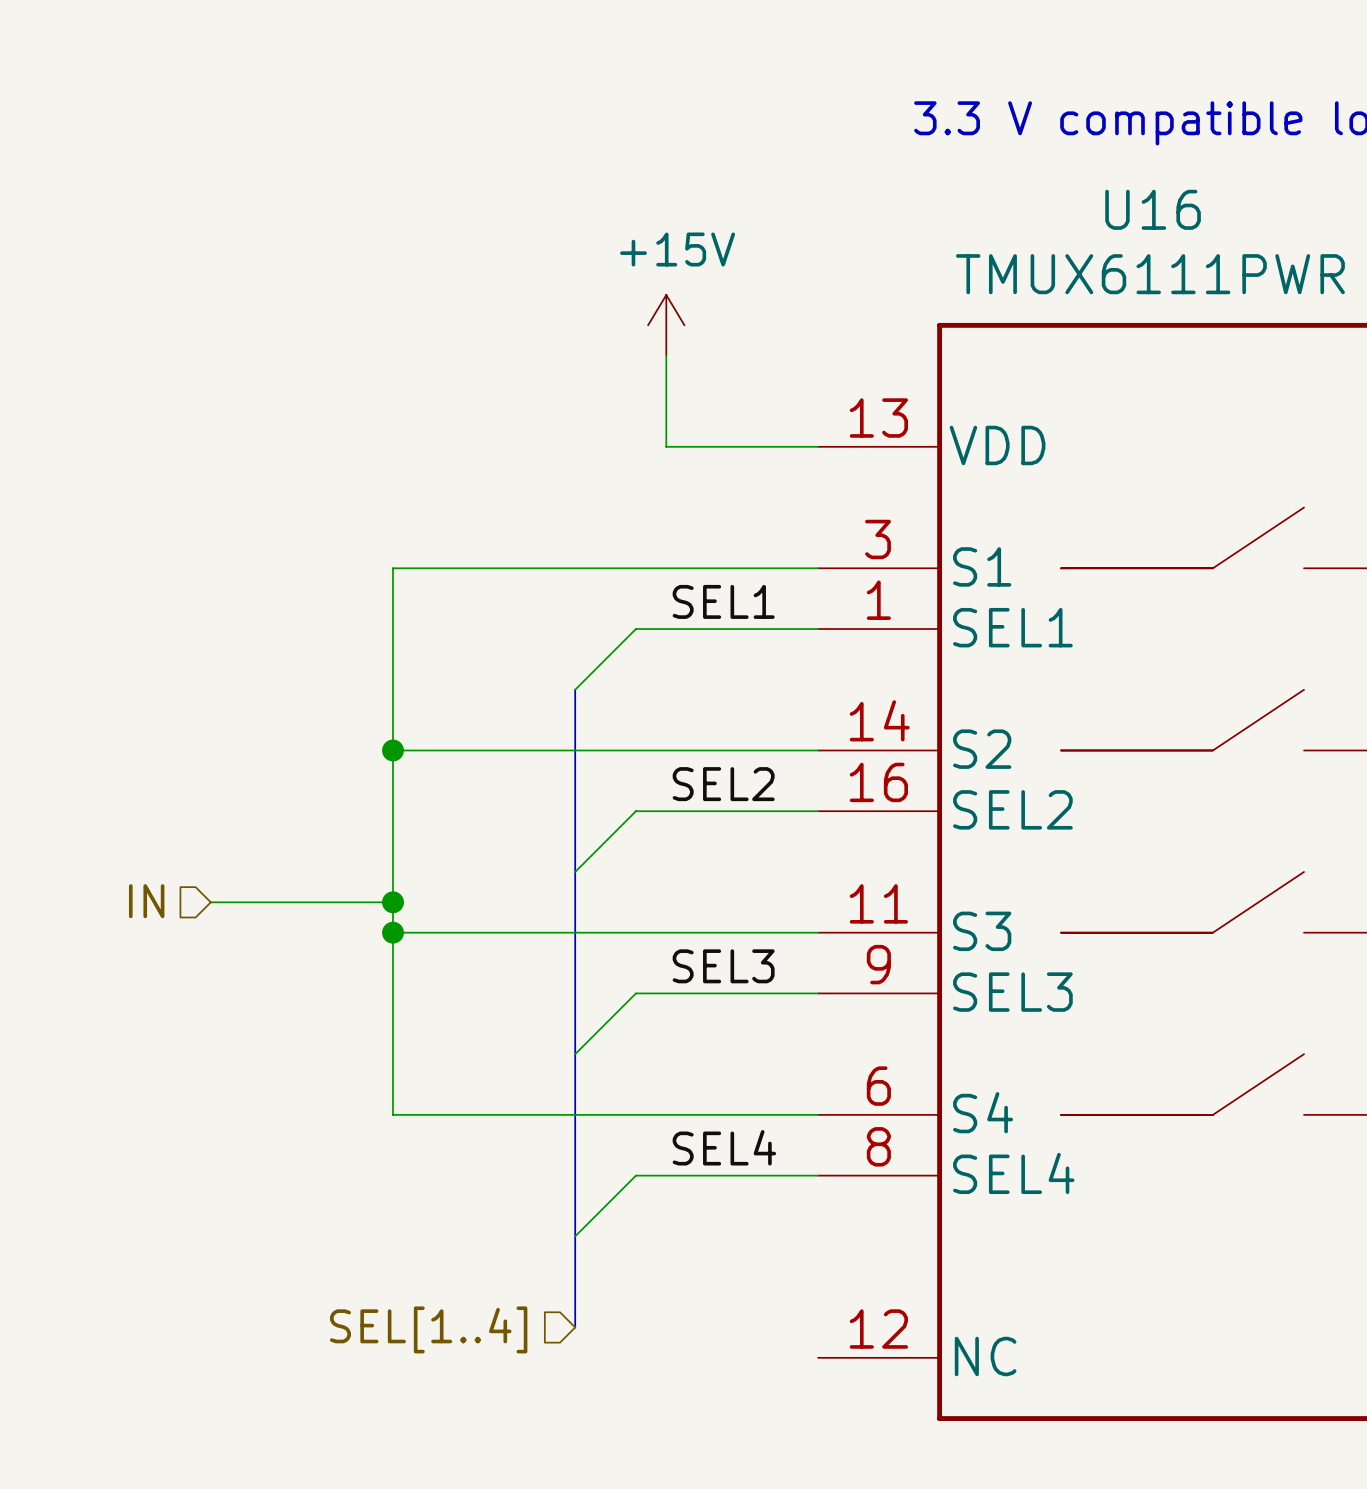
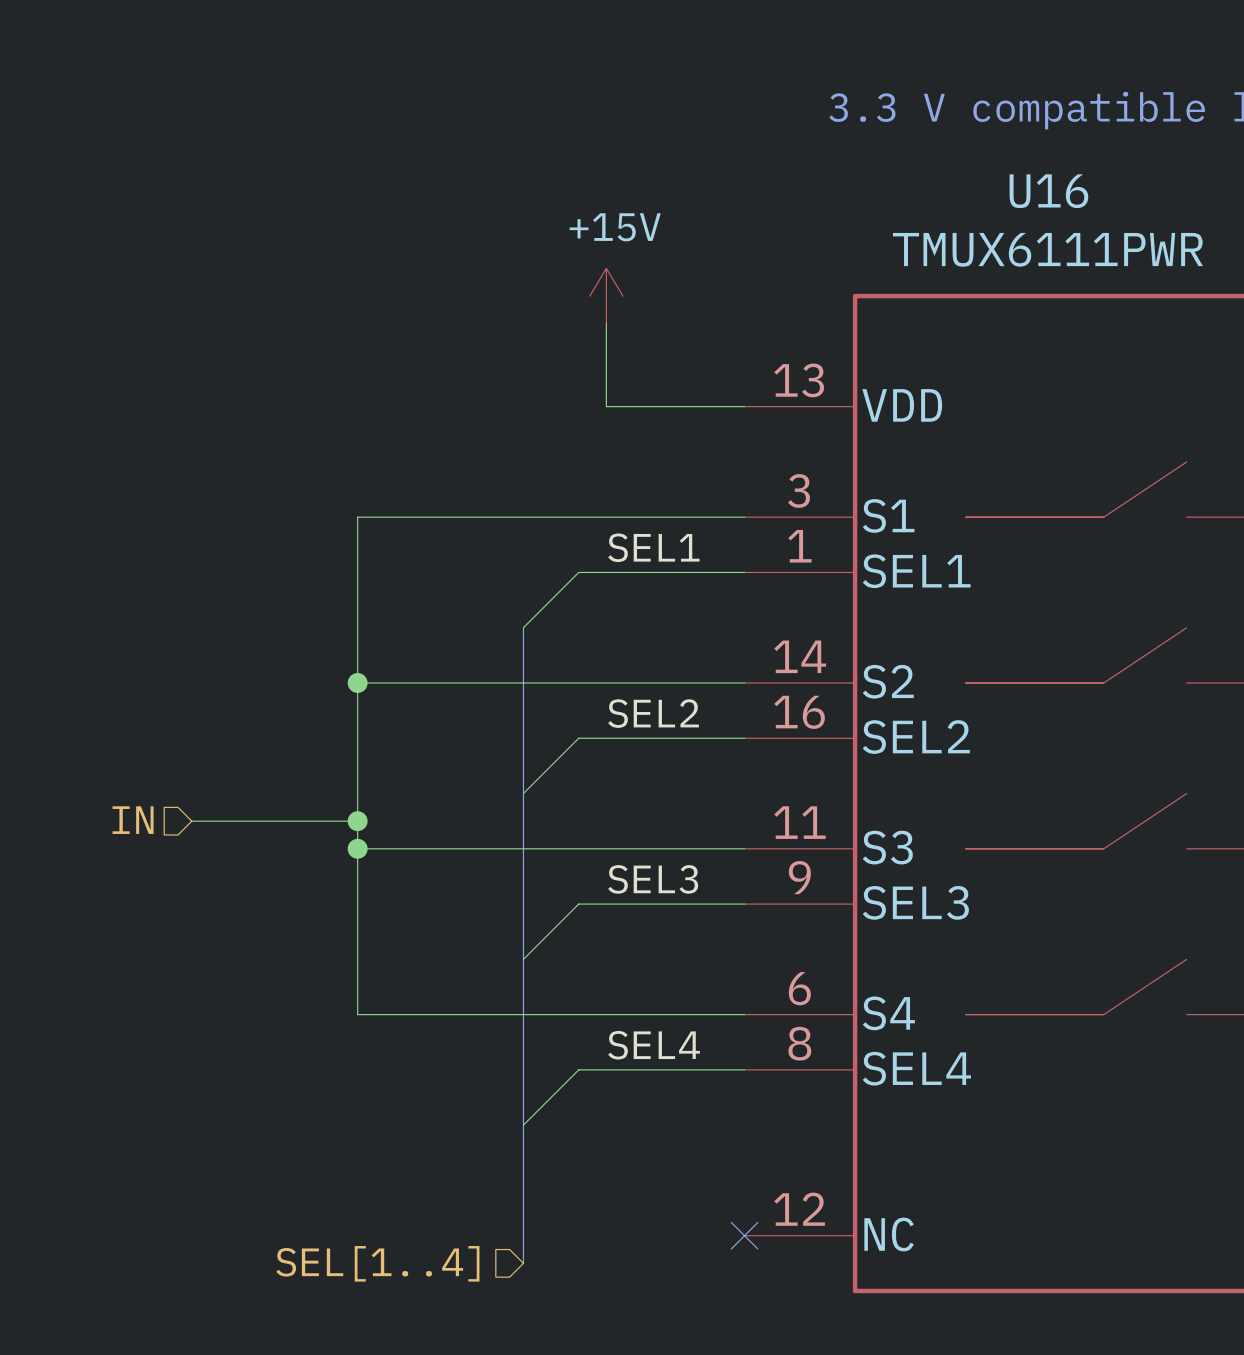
bus: none -> (523, 1208) (523, 1263)
hierarchical label position: SEL[1..4] (428, 1329) -> SEL[1..4] (377, 1263)
no-connect mark: none -> (744, 1235)

